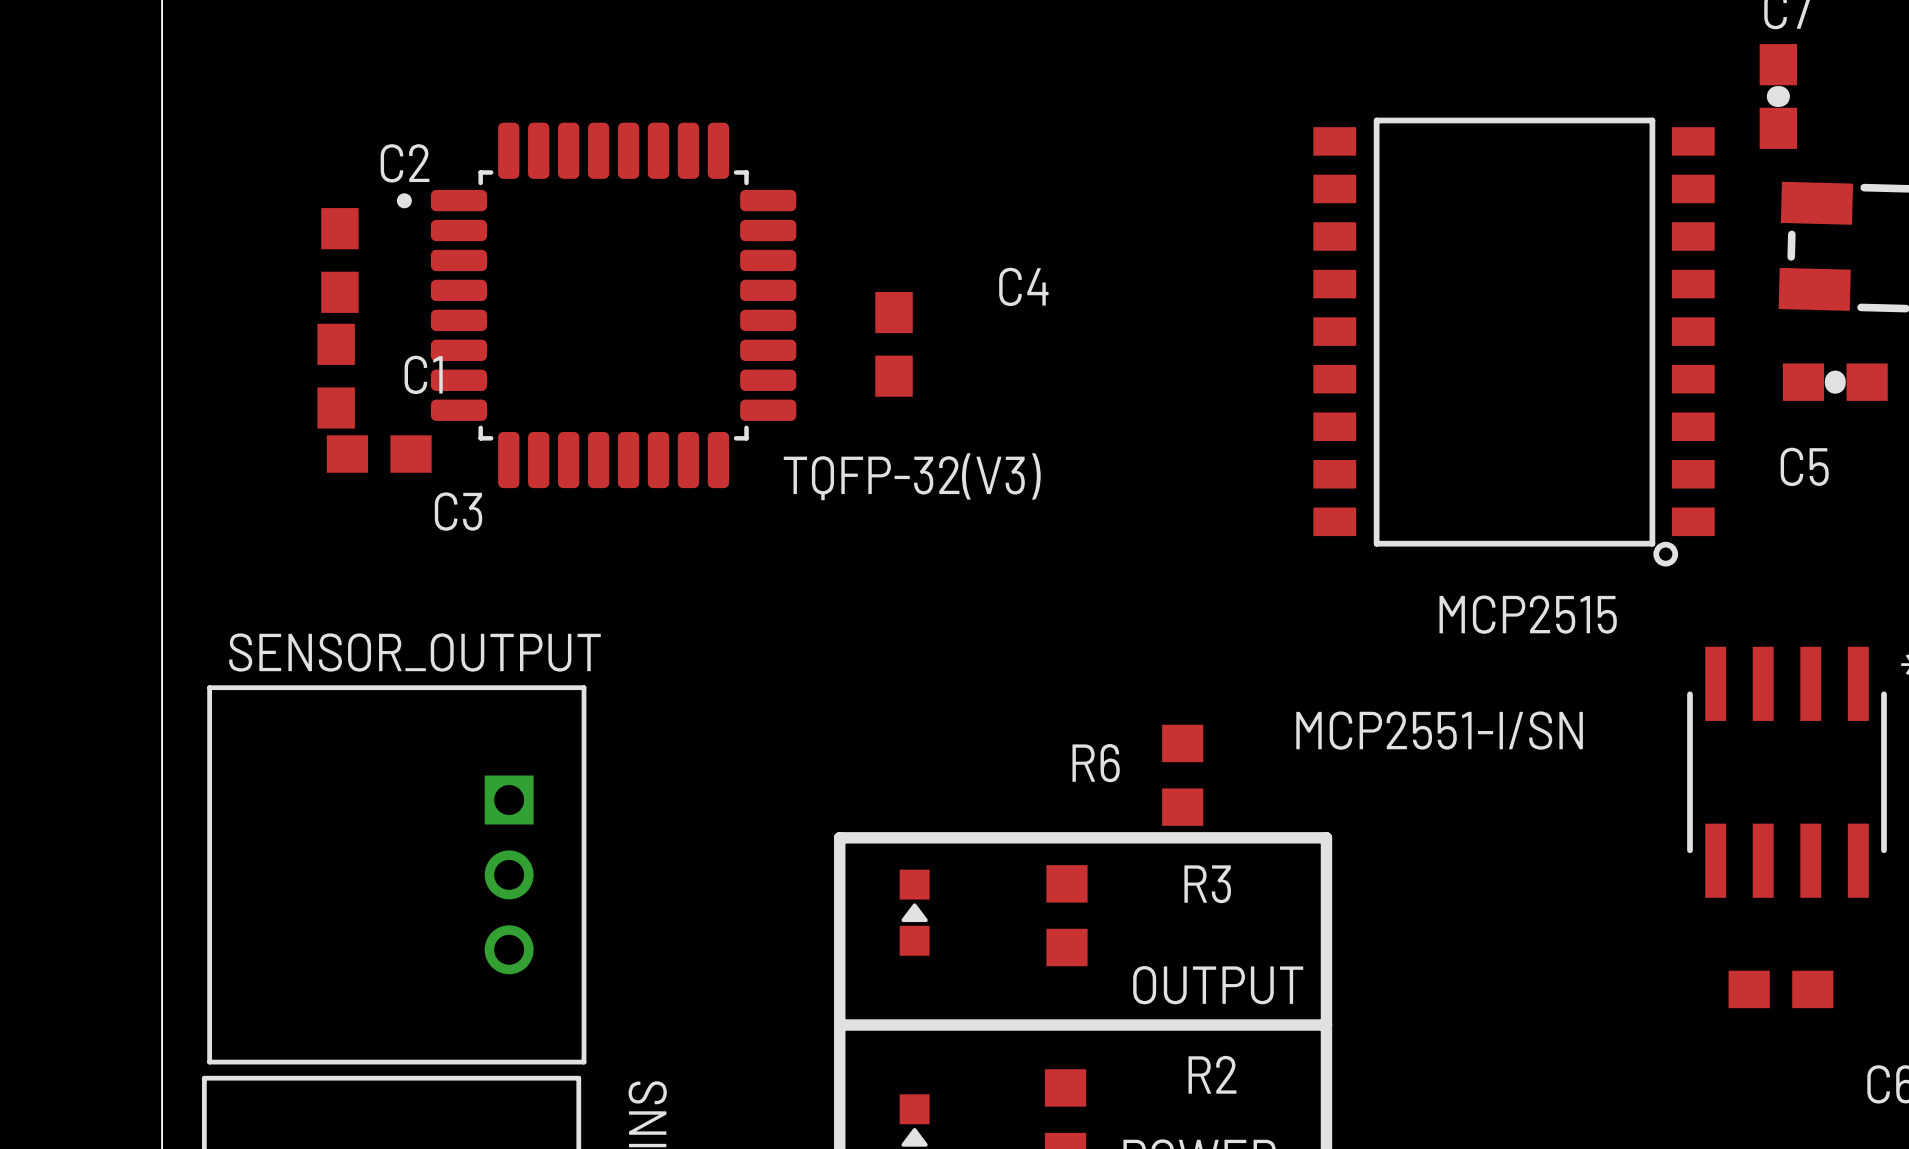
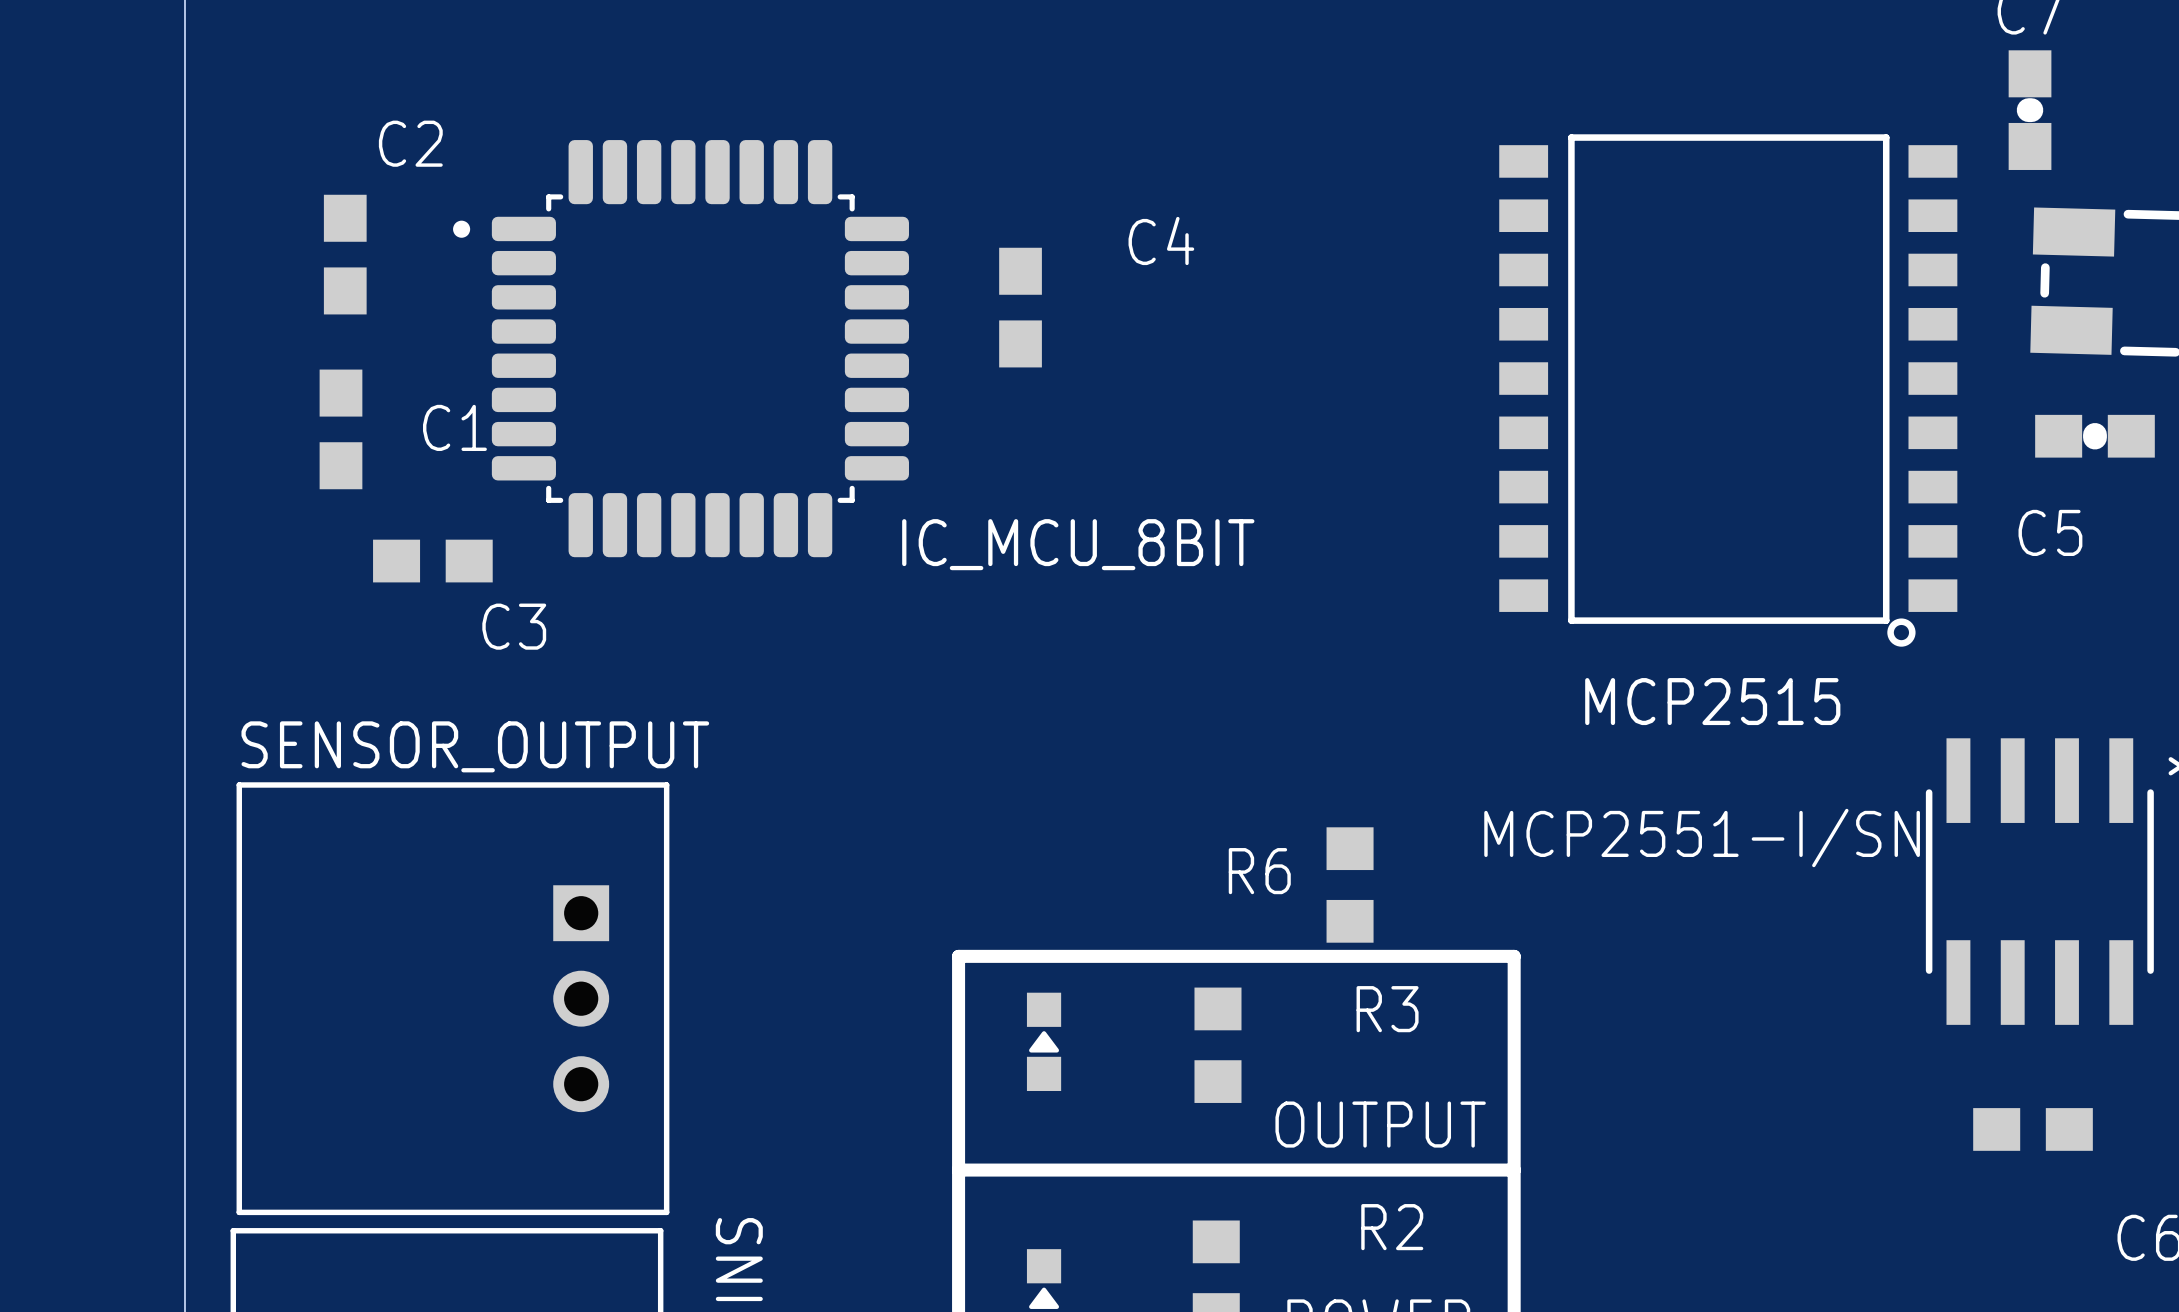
C2 position: (339, 260) -> (345, 254)
C4 position: (894, 344) -> (1020, 307)
C1 position: (336, 376) -> (340, 429)
C3 position: (379, 454) -> (432, 561)
TQFP-32(V3) name: TQFP-32(V3) (912, 476) -> IC_MCU_8BIT (1078, 544)

